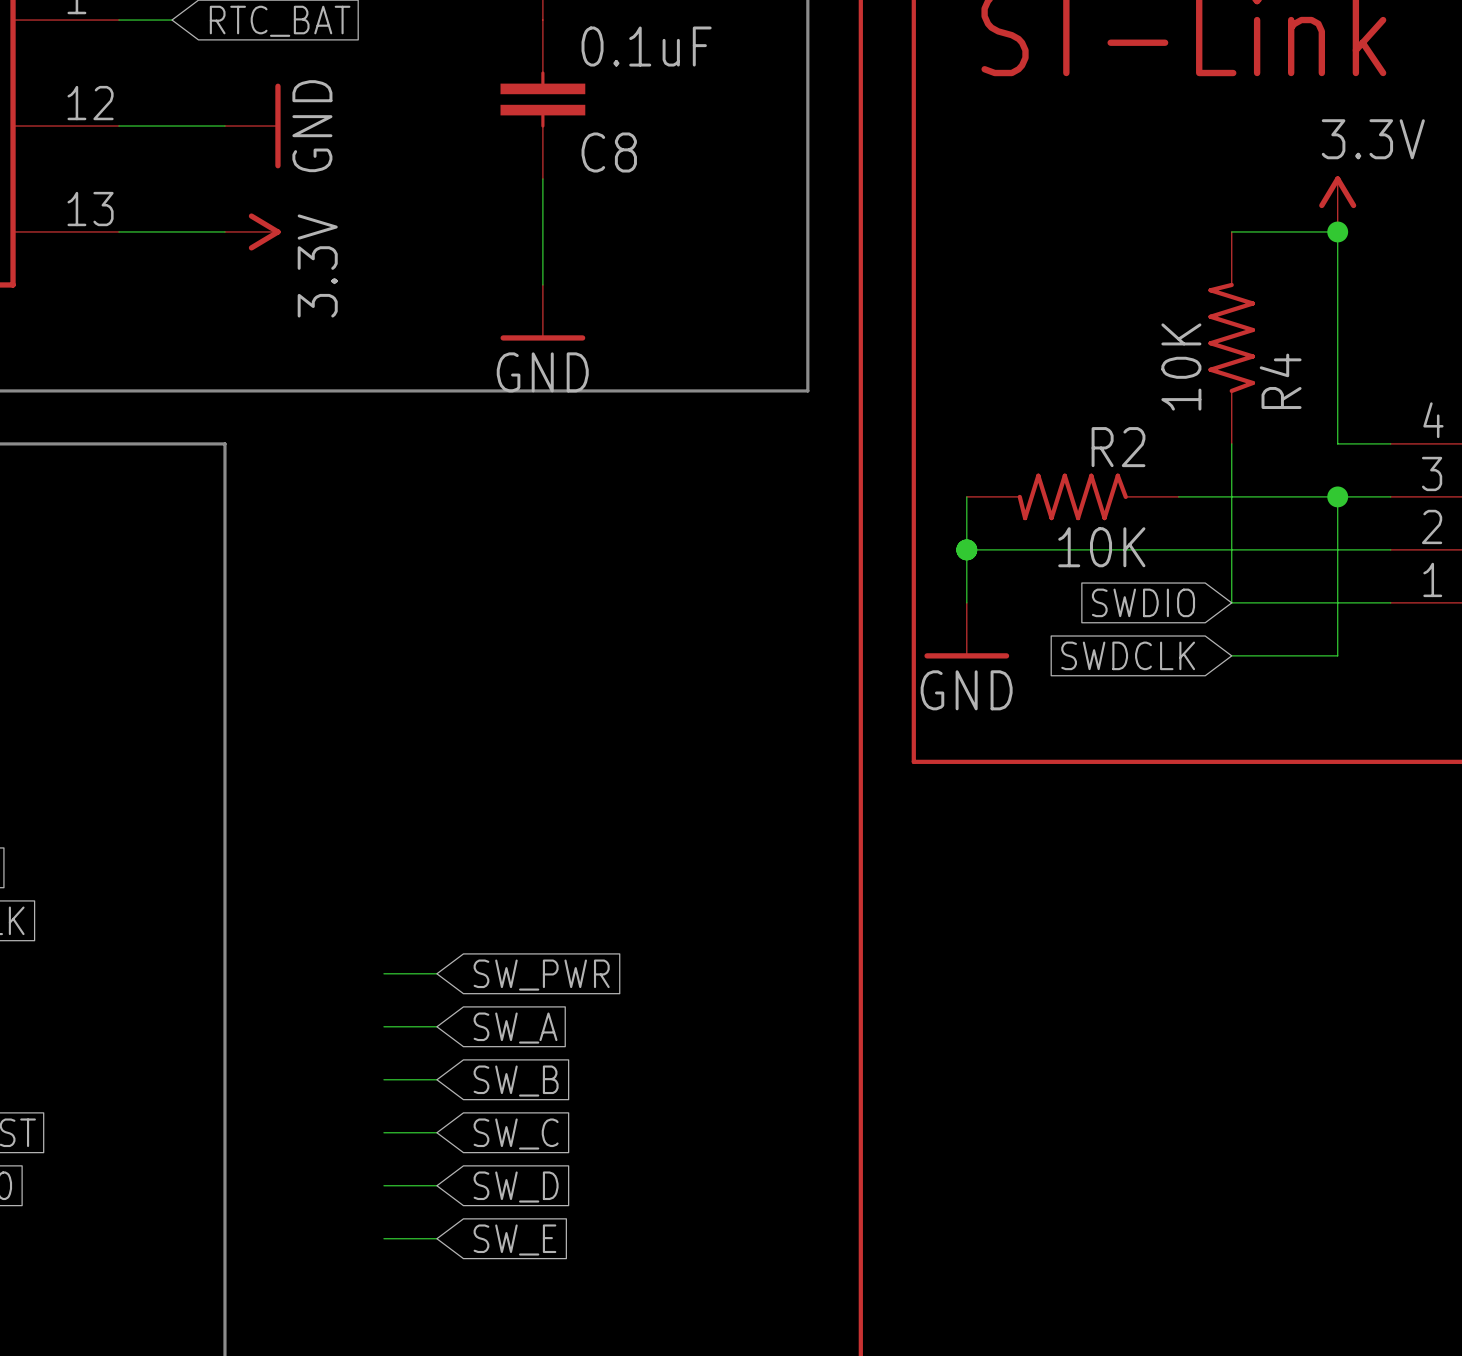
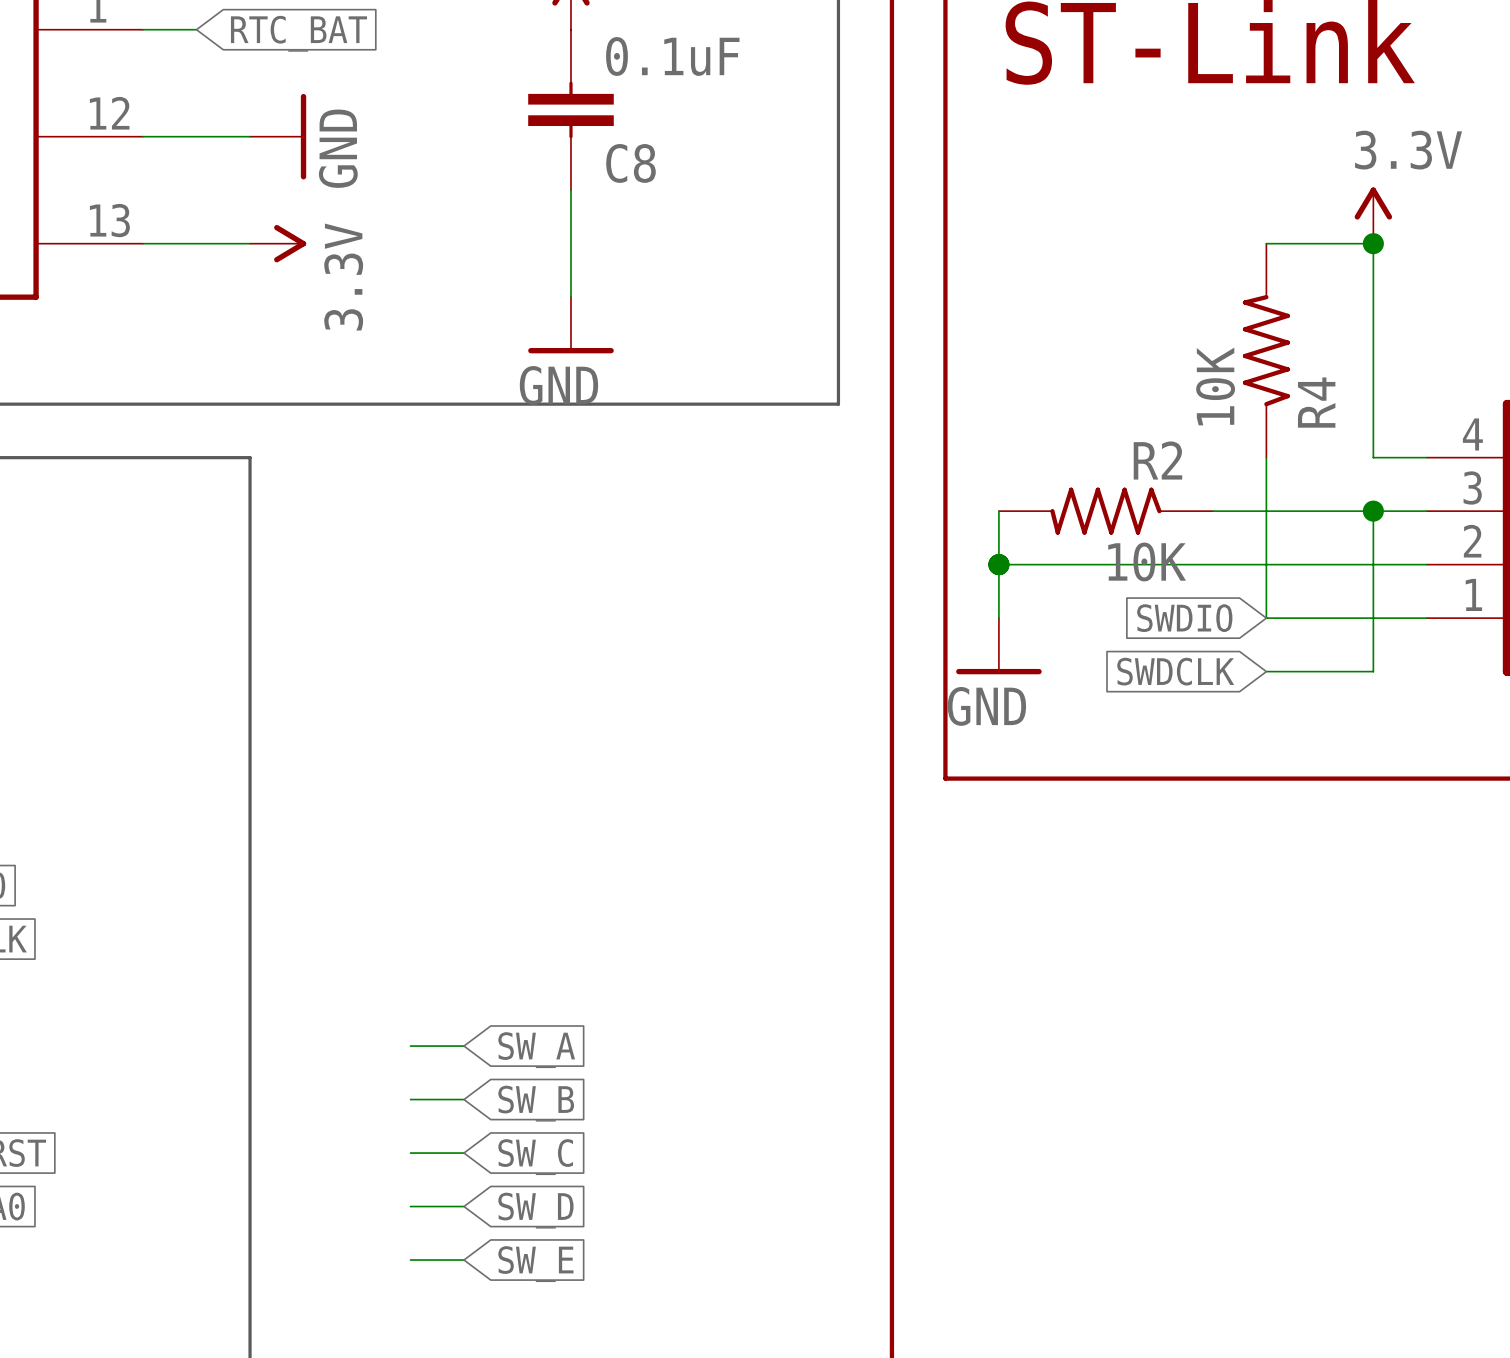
wire: (383, 973) (436, 973) -> none
global label: SW_PWR (541, 975) -> none

